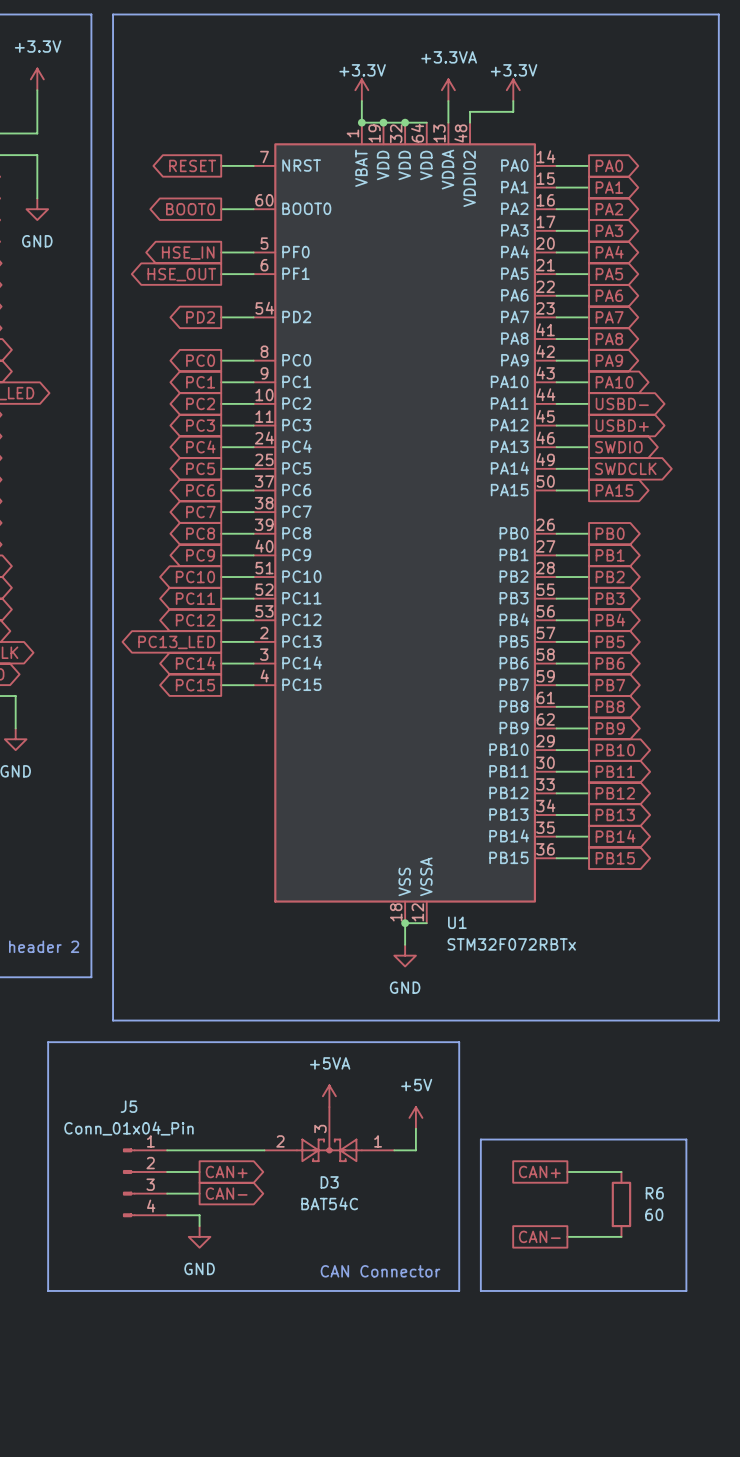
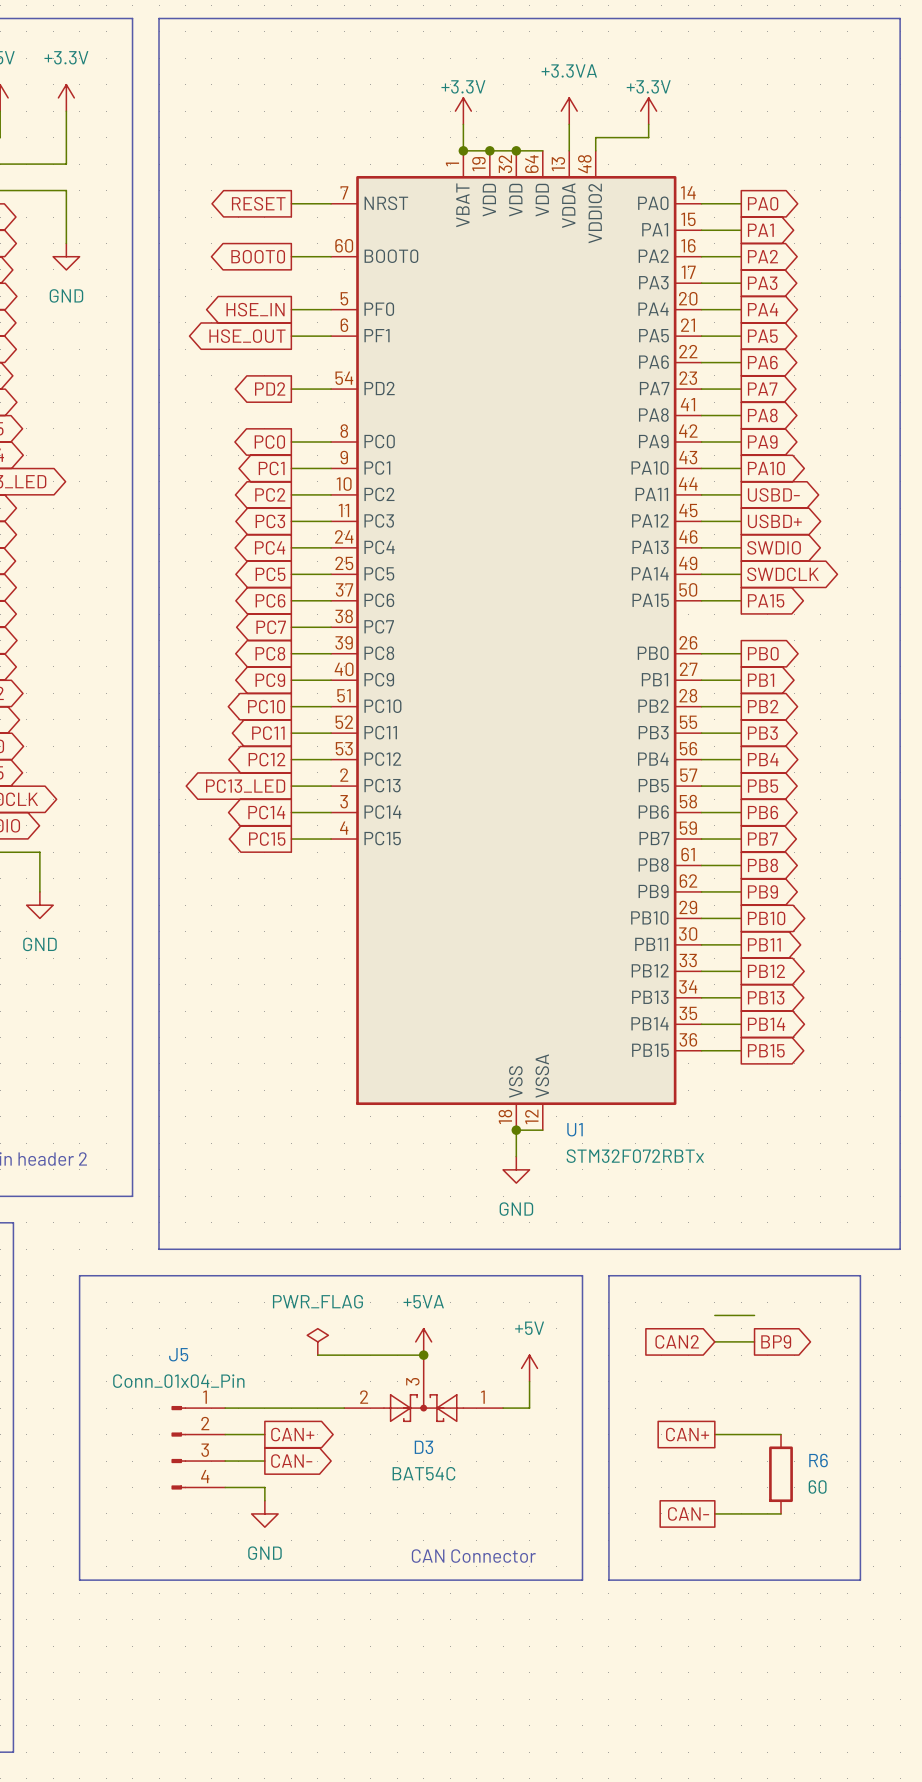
wire: none -> (714, 1315) (754, 1315)
power symbol: none -> PWR_FLAG (317, 1341)
global label: none -> CAN2 (677, 1341)
wire: none -> (714, 1341) (754, 1341)
global label: none -> BP9 (776, 1341)
wire: none -> (317, 1355) (423, 1355)
junction: none -> (423, 1355)
line: (480, 1139) (686, 1139) -> (608, 1394) (608, 1275) (860, 1275) (860, 1394)

